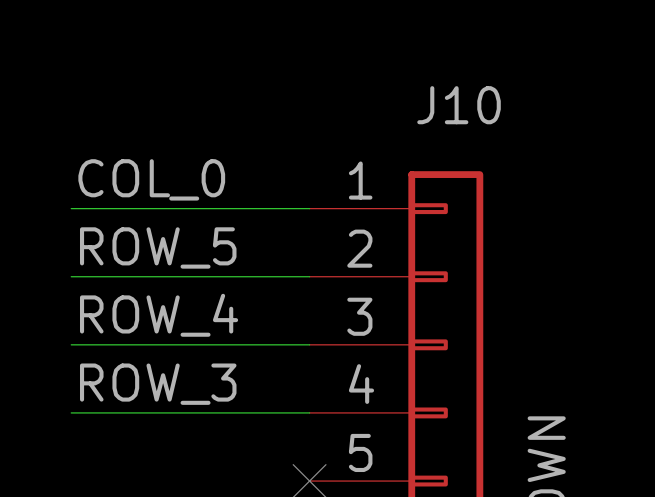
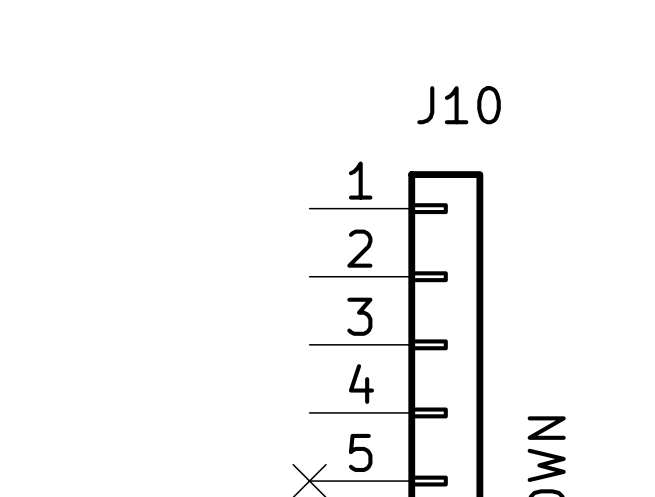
label: COL_0 (151, 179) -> none
wire: (71, 208) (309, 208) -> none
label: ROW_5 (158, 247) -> none
wire: (71, 276) (309, 276) -> none
label: ROW_4 (159, 315) -> none
wire: (71, 344) (309, 344) -> none
label: ROW_3 (158, 384) -> none
wire: (71, 412) (309, 412) -> none

